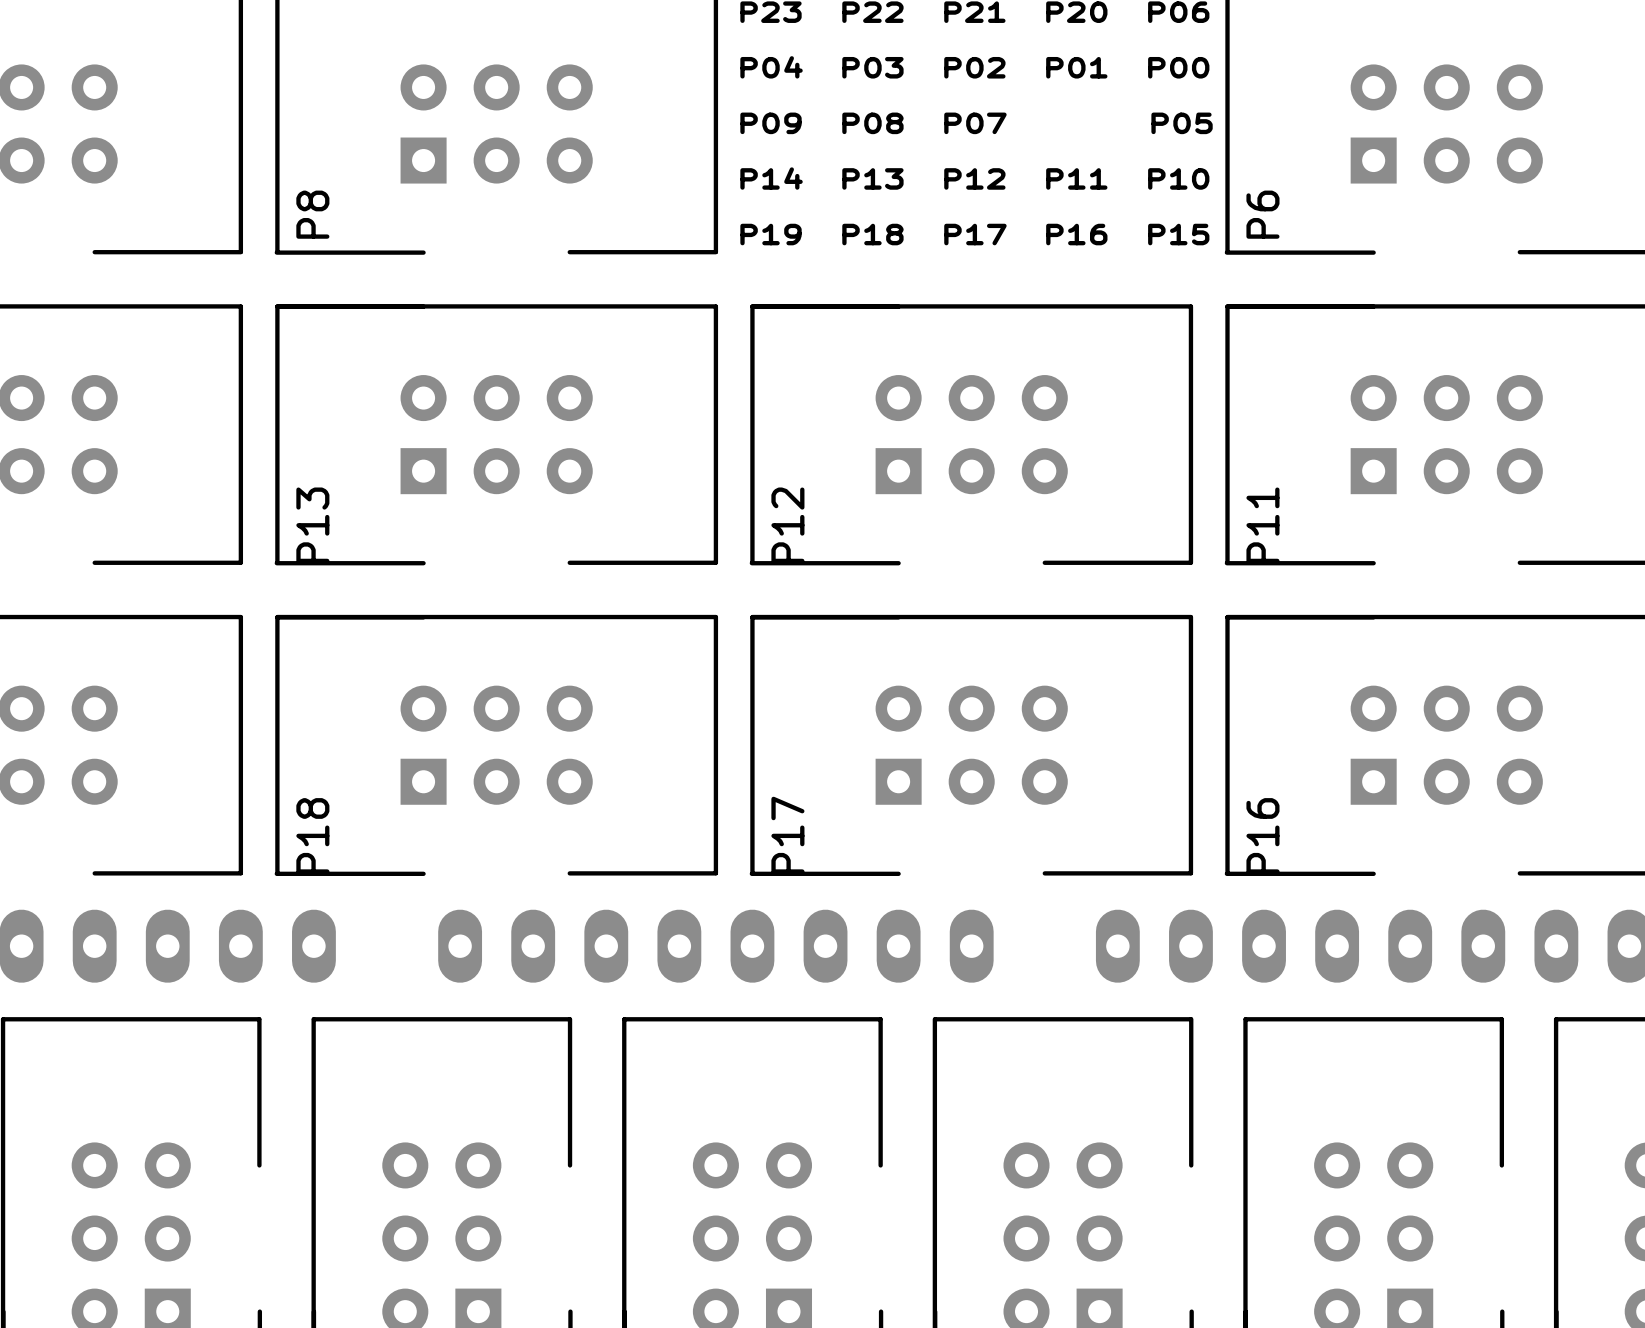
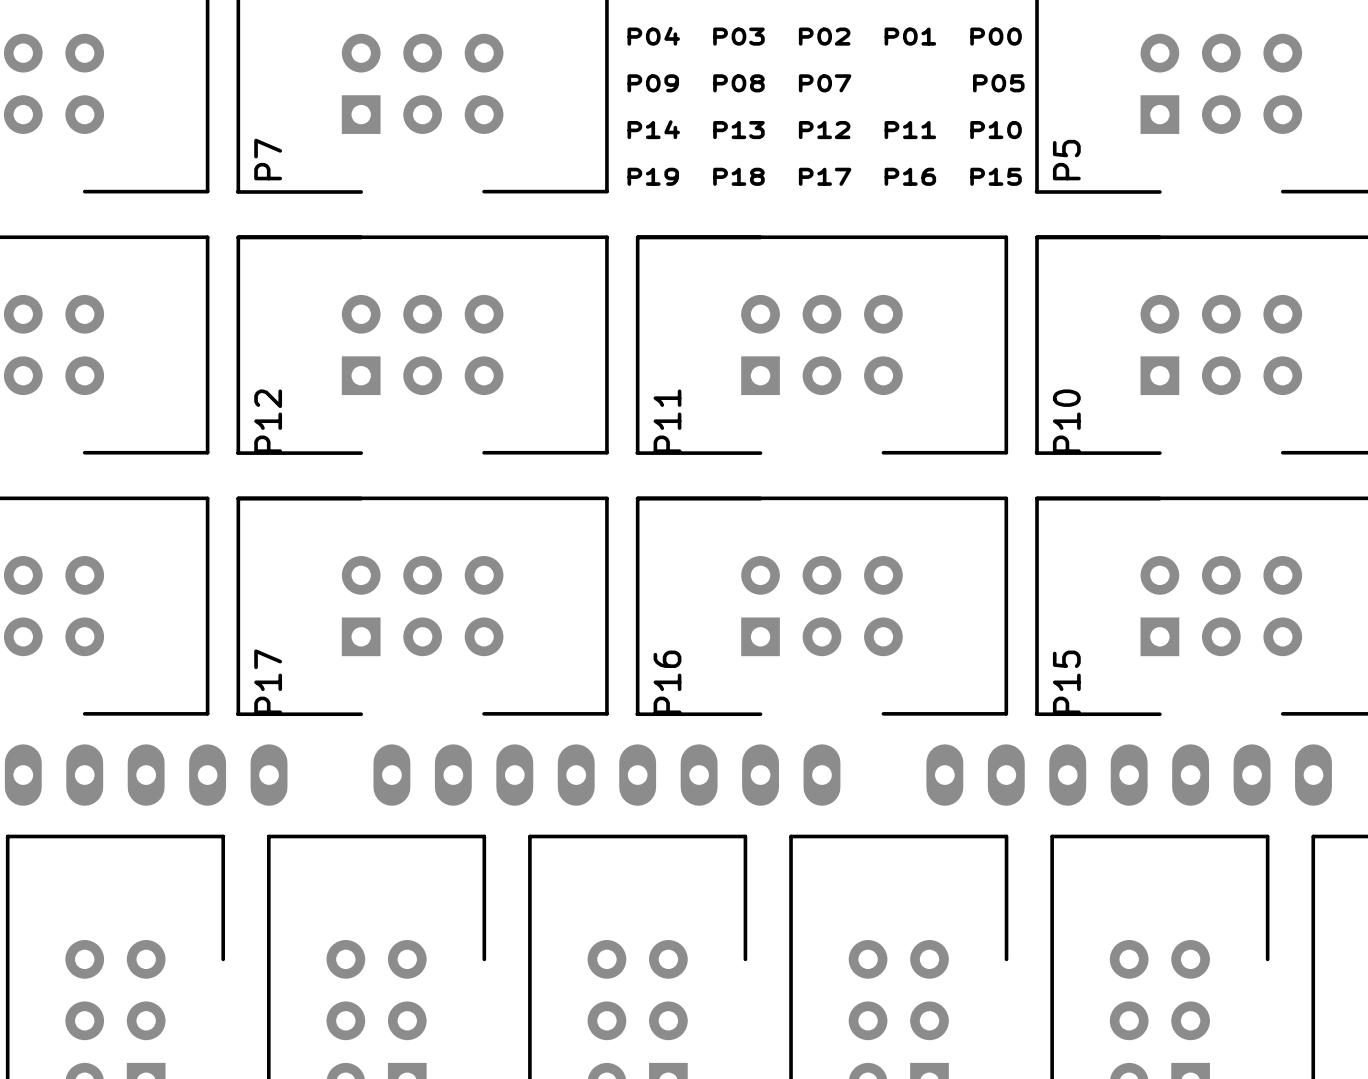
P8 name: P8 (312, 214) -> P7 (268, 159)
P6 name: P6 (1262, 214) -> P5 (1066, 160)
P13 name: P13 (312, 525) -> P12 (268, 421)
P12 name: P12 (787, 525) -> P11 (667, 421)
P11 name: P11 (1262, 525) -> P10 (1066, 421)
P18 name: P18 (312, 835) -> P17 (268, 681)
P17 name: P17 (787, 835) -> P16 (667, 682)
P16 name: P16 (1262, 835) -> P15 (1066, 682)

